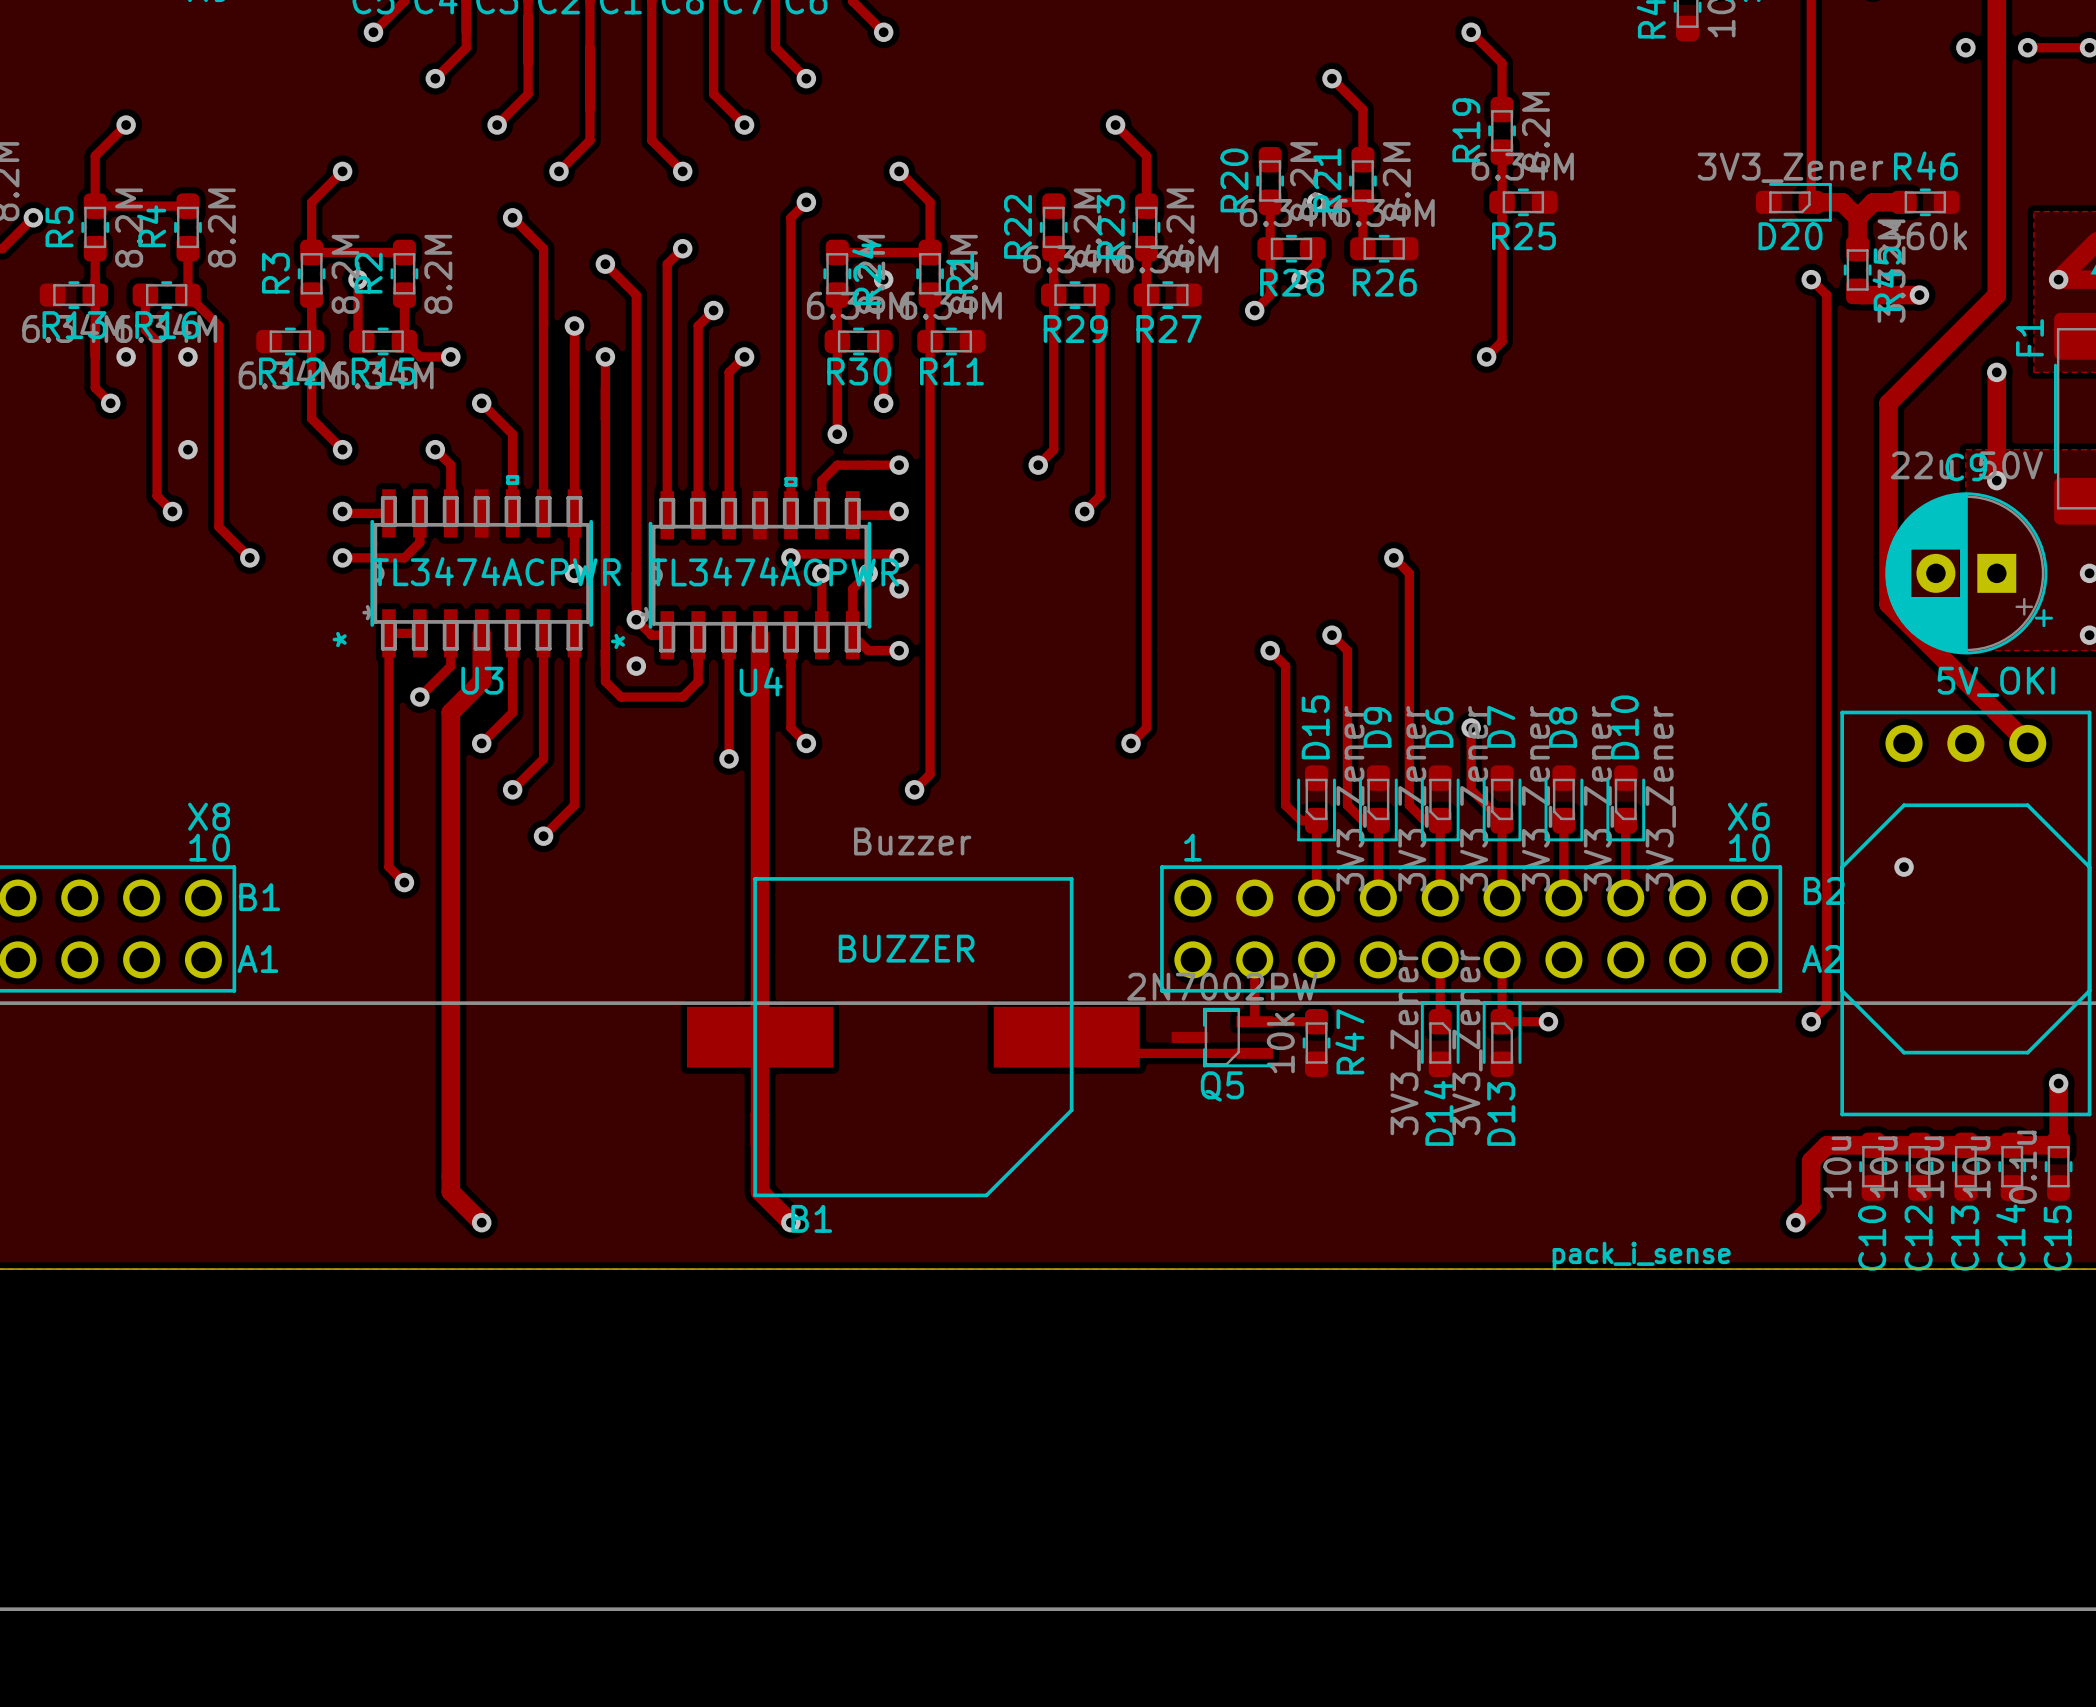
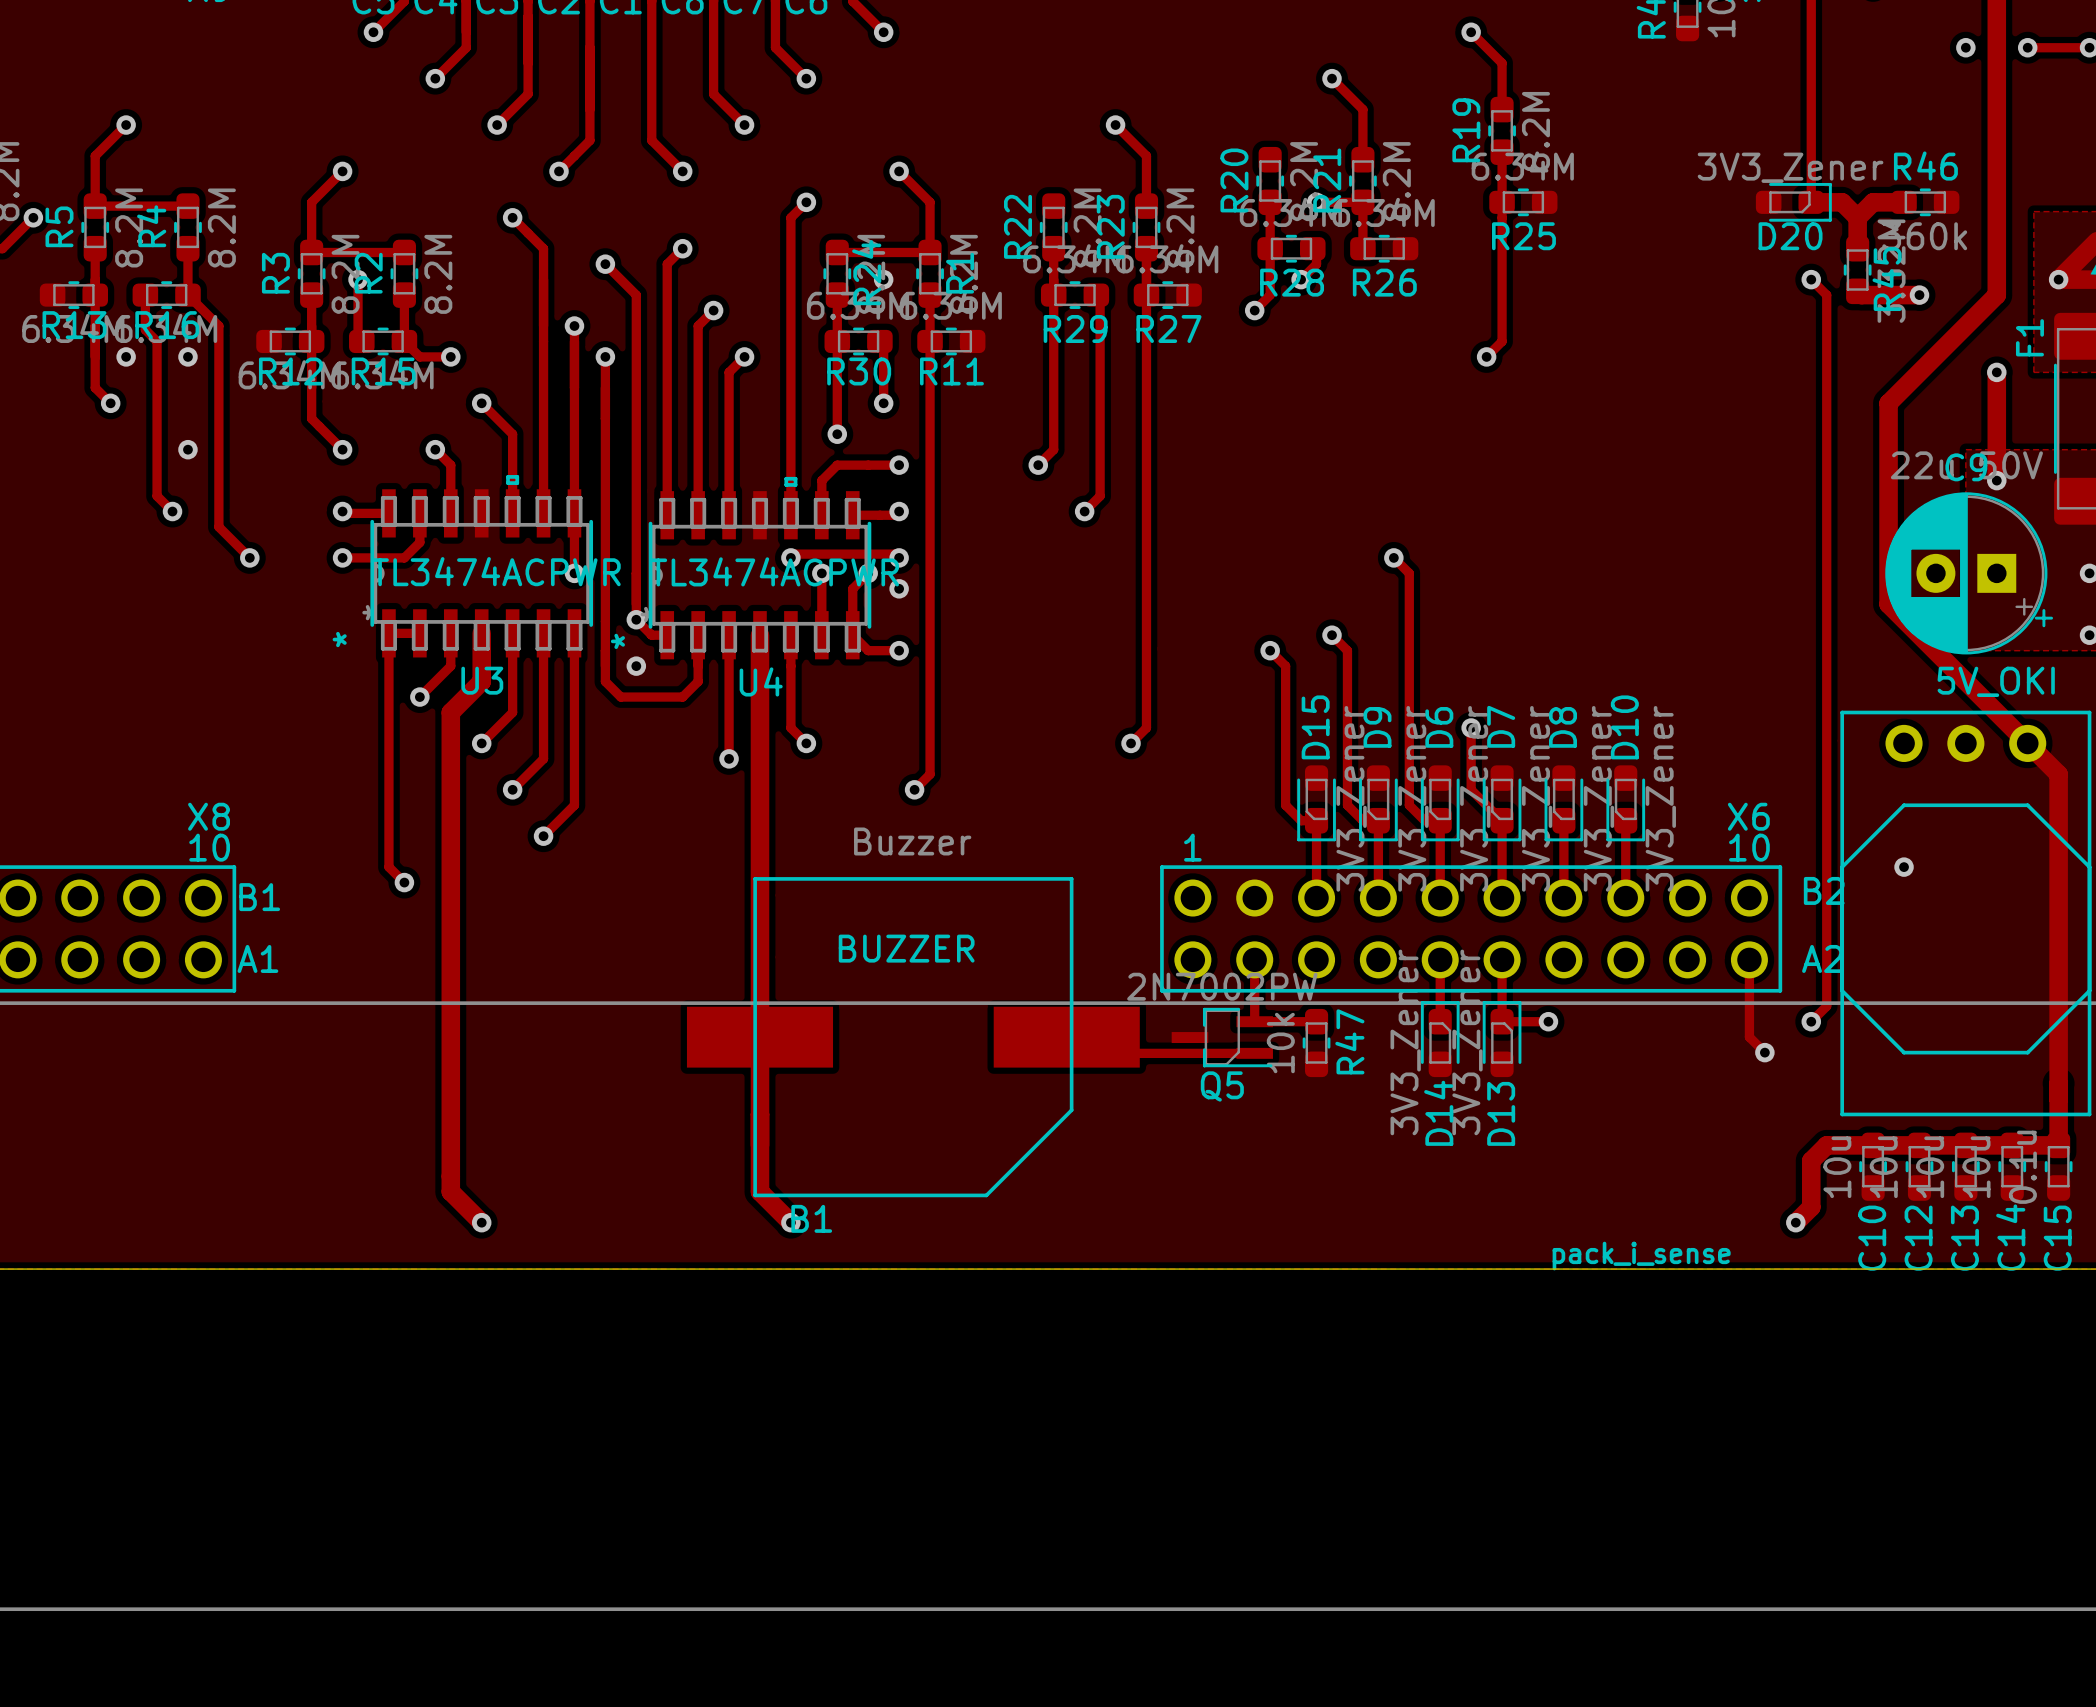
track: none -> (2027, 743) (2058, 774) (2058, 1083)
track: none -> (1749, 959) (1749, 1037) (1764, 1052)
via: none -> (1764, 1052)
via: (2058, 1083) -> none

